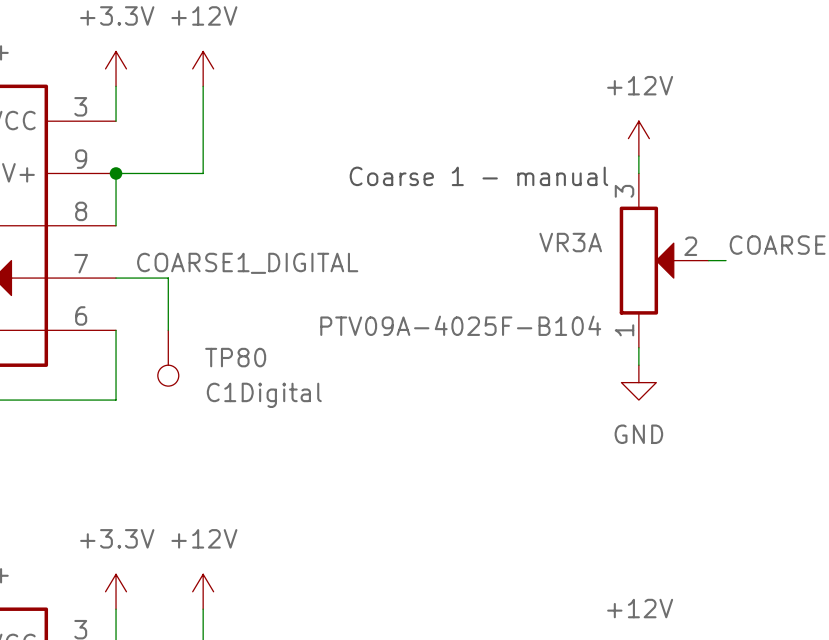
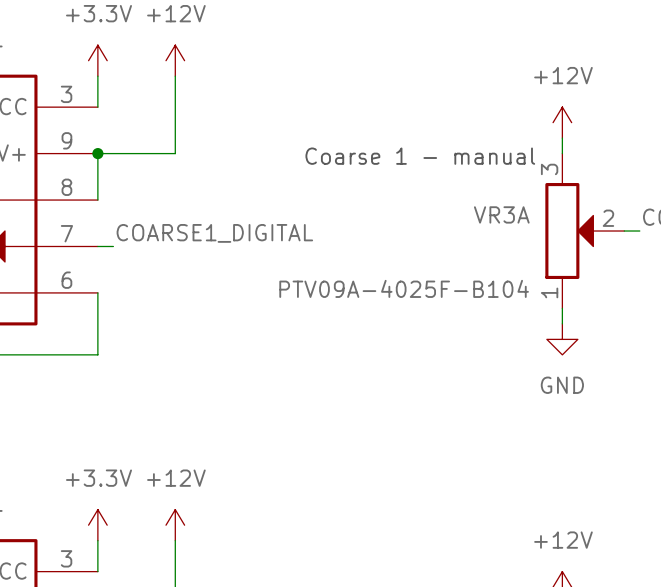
wire: (133, 278) (168, 278) (168, 330) -> none
TP80: C1Digital (168, 358) -> none

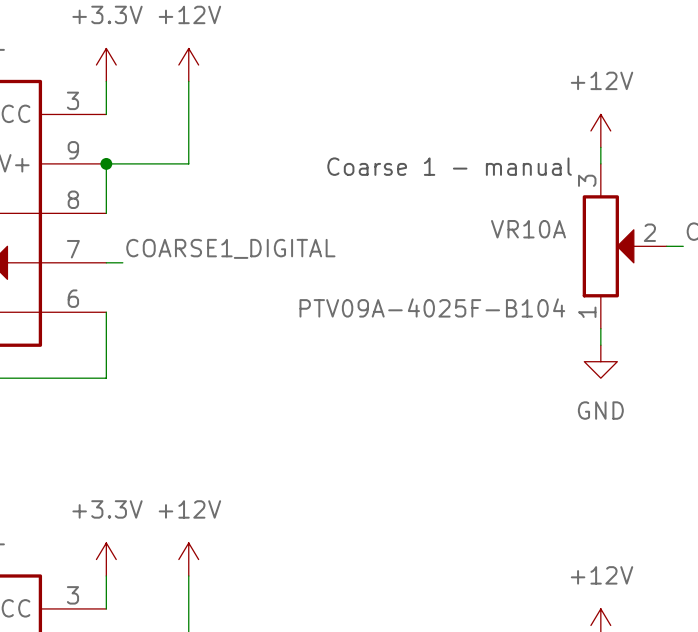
VR3A name: VR3A (501, 214) -> VR10A (528, 229)

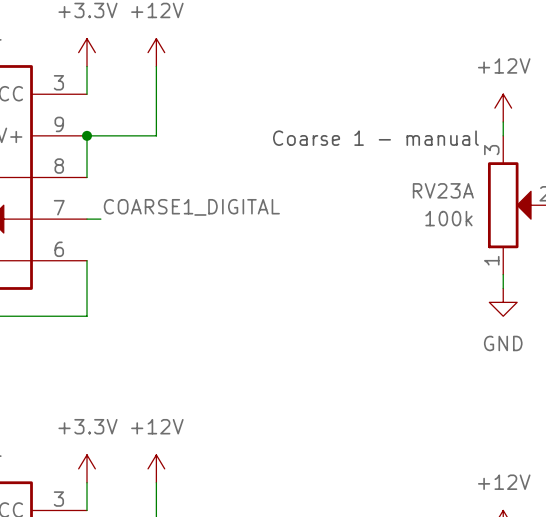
VR10A name: VR10A (528, 229) -> RV23A (443, 190)
VR10A value: PTV09A-4025F-B104 (432, 307) -> 100k (448, 218)

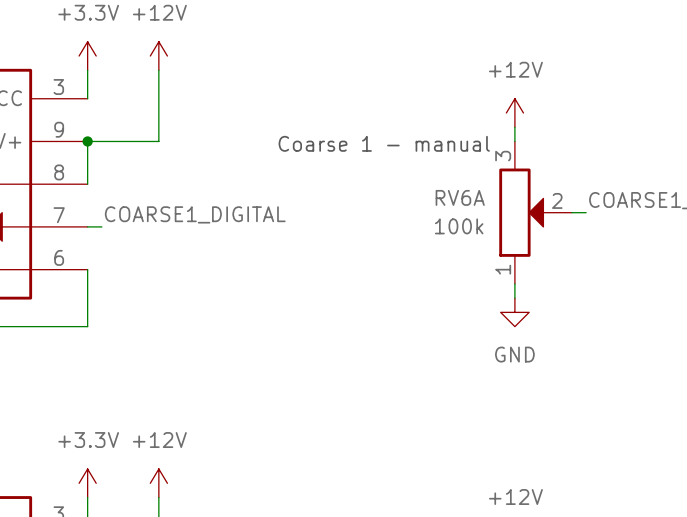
RV23A name: RV23A (443, 190) -> RV6A (460, 197)

